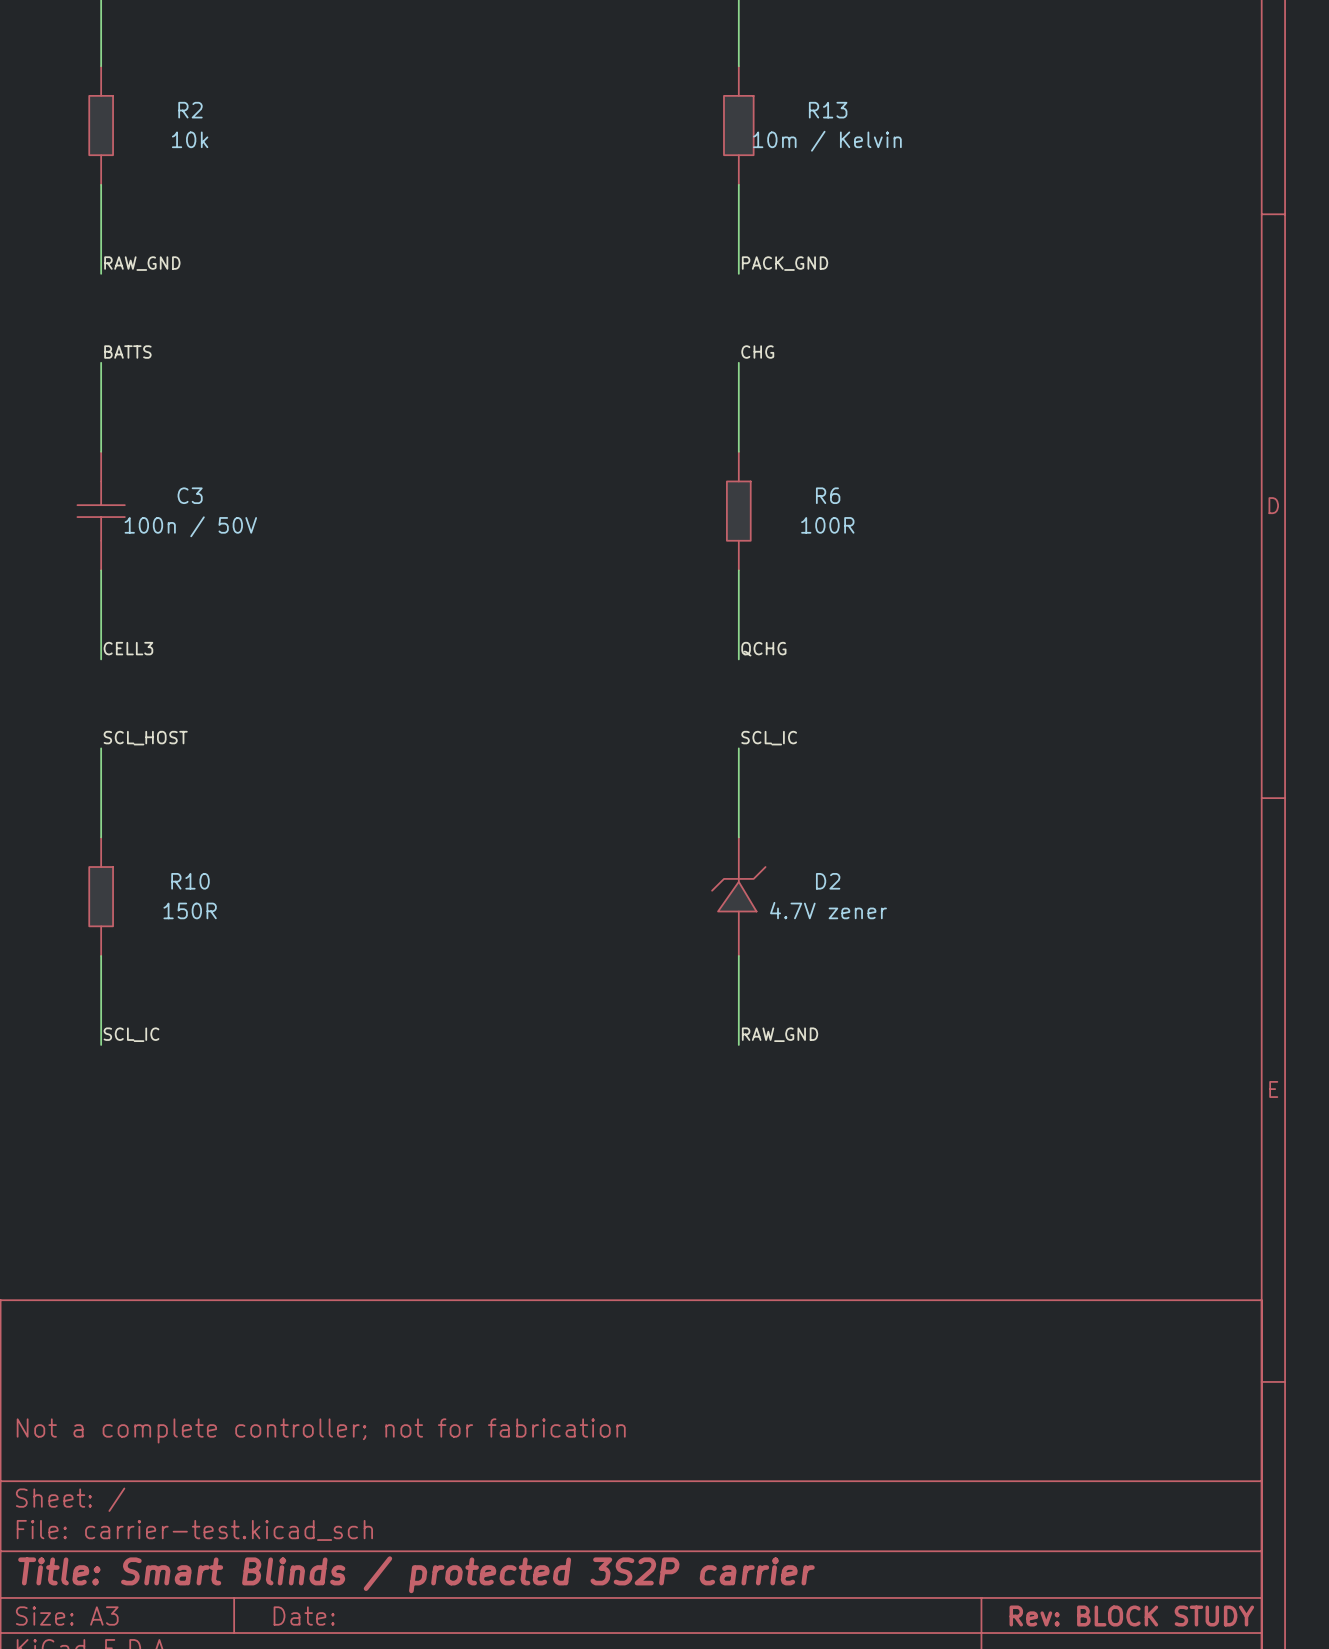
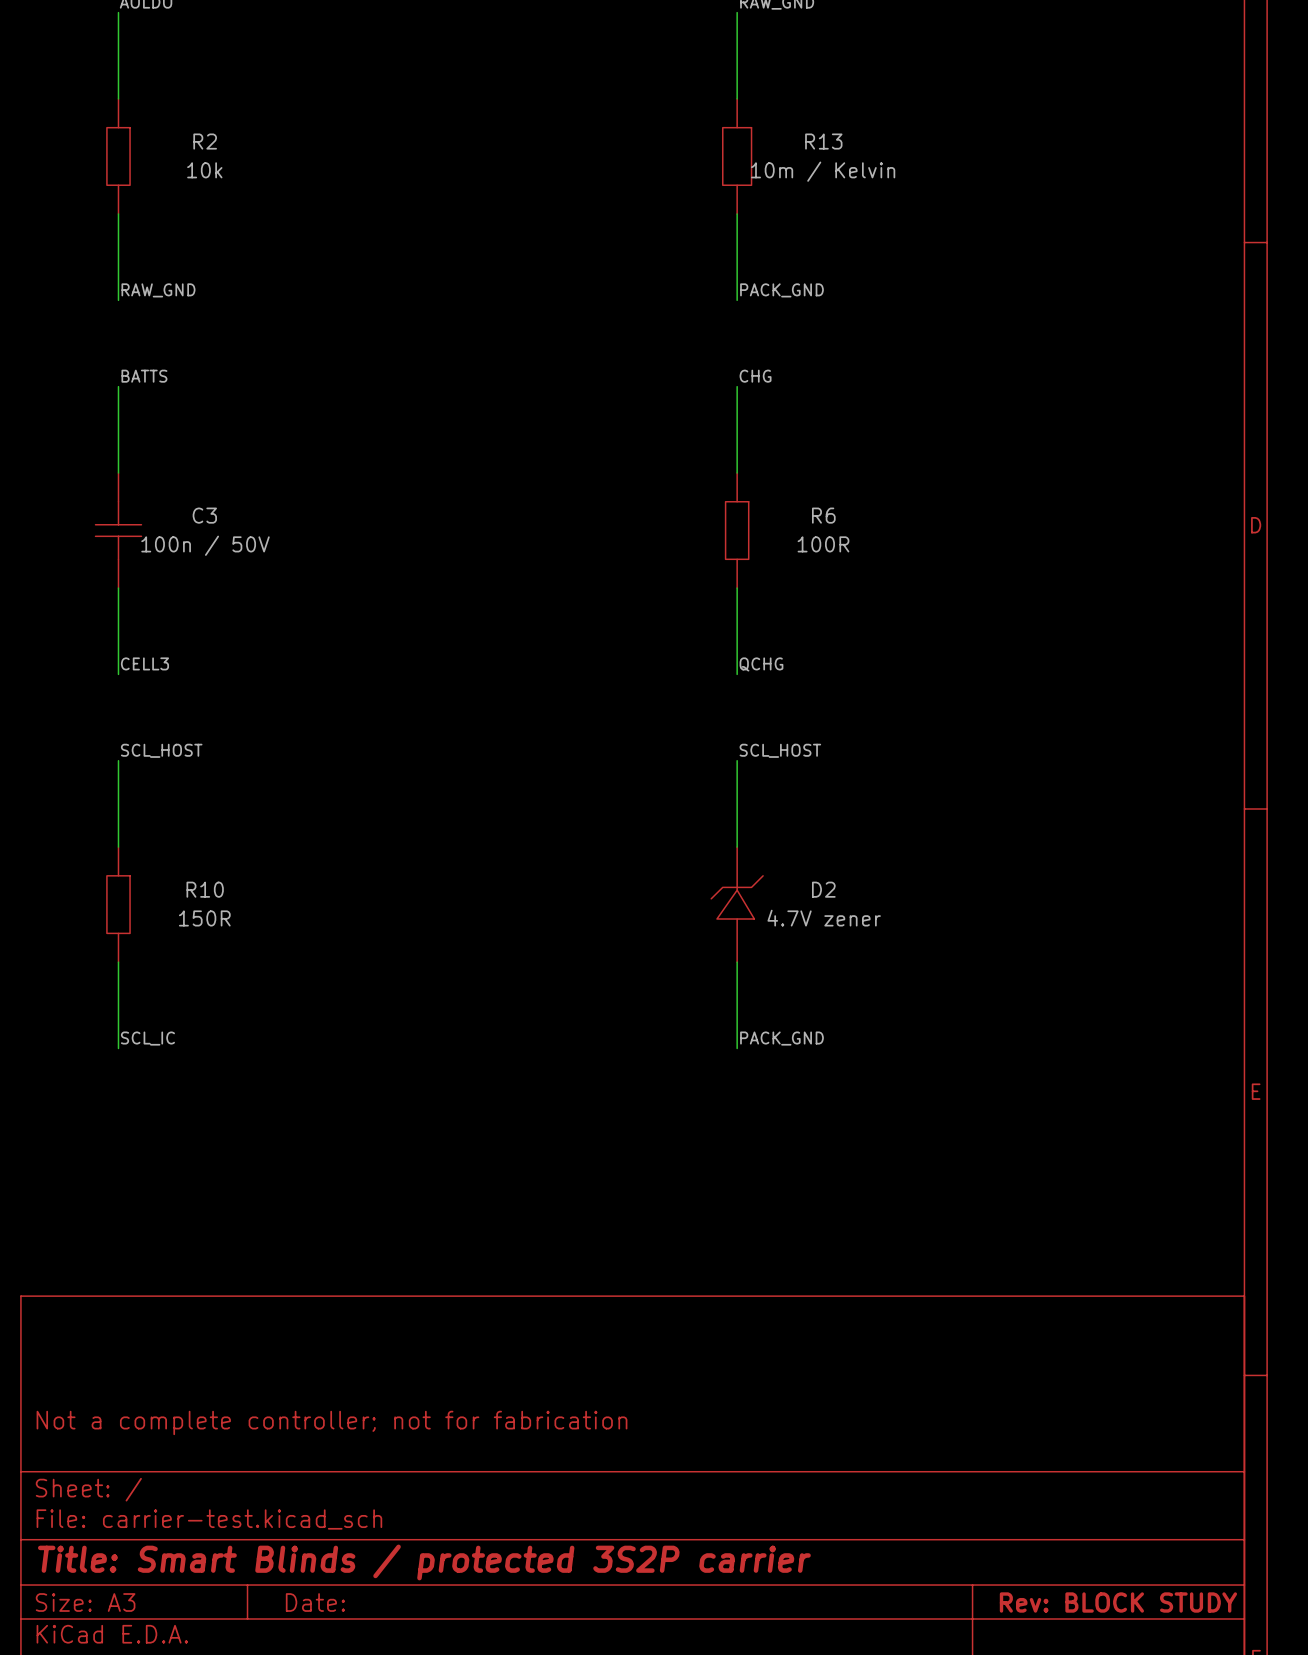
label: SCL_IC (769, 738) -> SCL_HOST (780, 750)
label: RAW_GND (780, 1034) -> PACK_GND (781, 1038)

